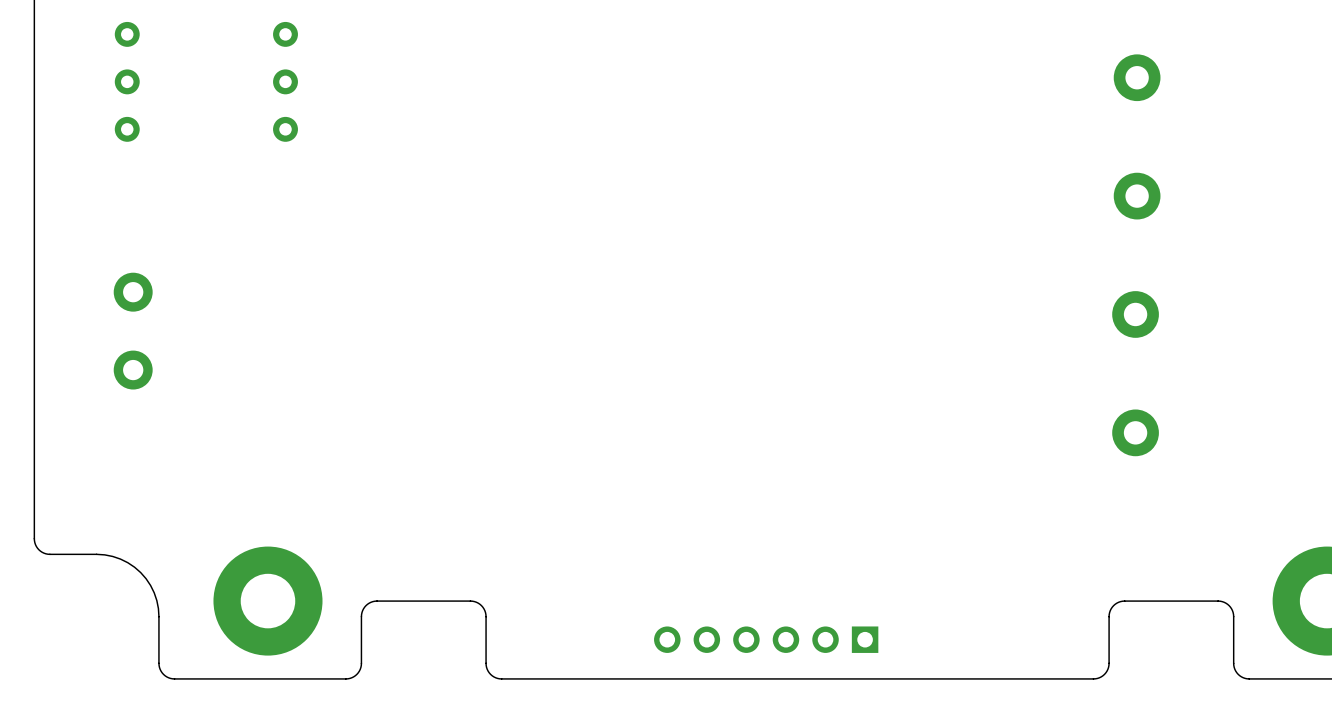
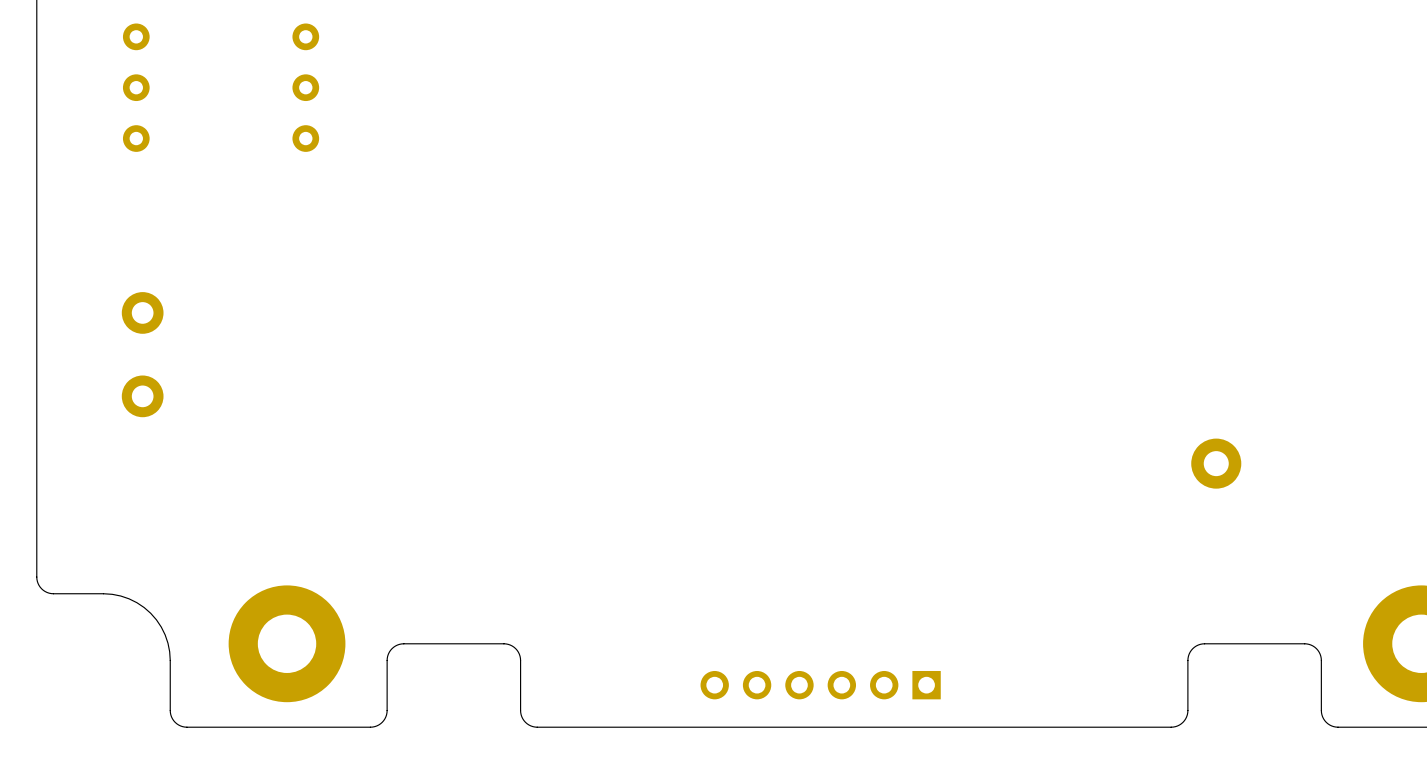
part: (1137, 77) -> none
part: (1137, 196) -> none
part: (1135, 314) -> none

